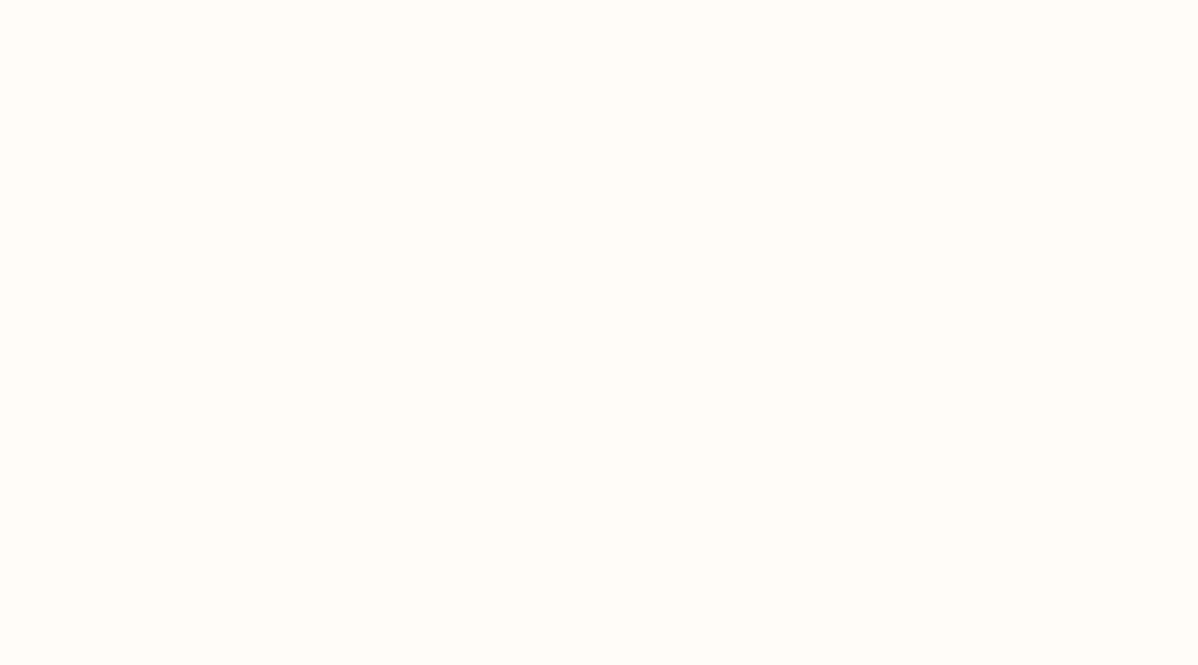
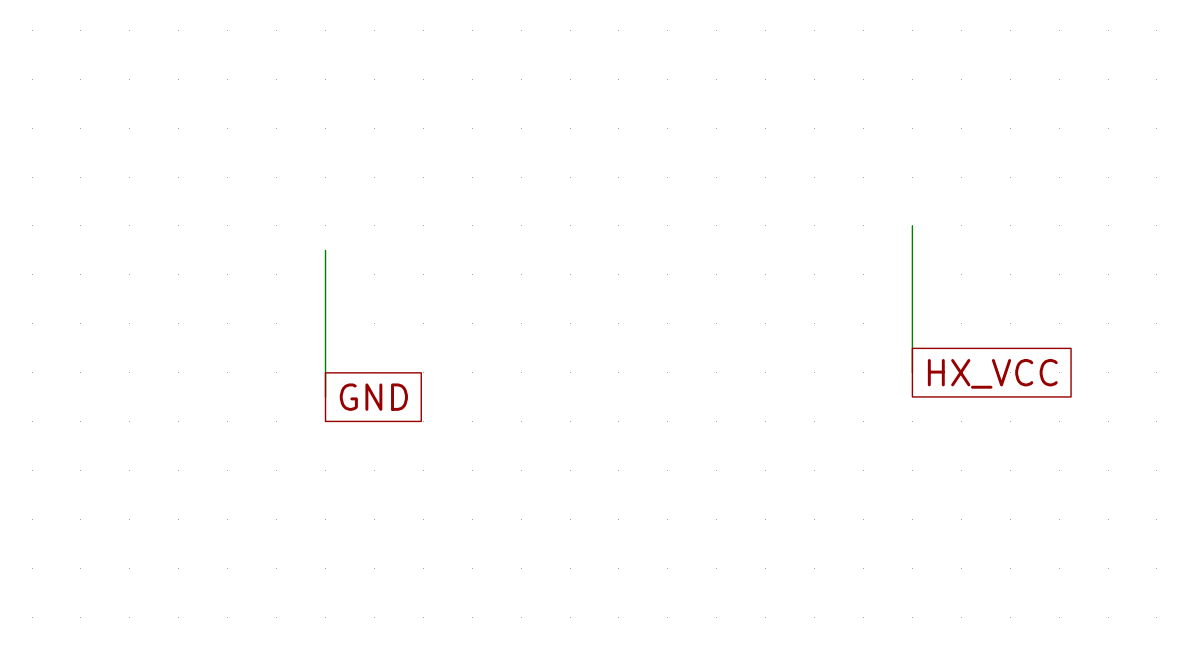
wire: none -> (912, 225) (912, 372)
wire: none -> (325, 250) (325, 397)
global label: none -> HX_VCC (992, 373)
global label: none -> GND (373, 397)

